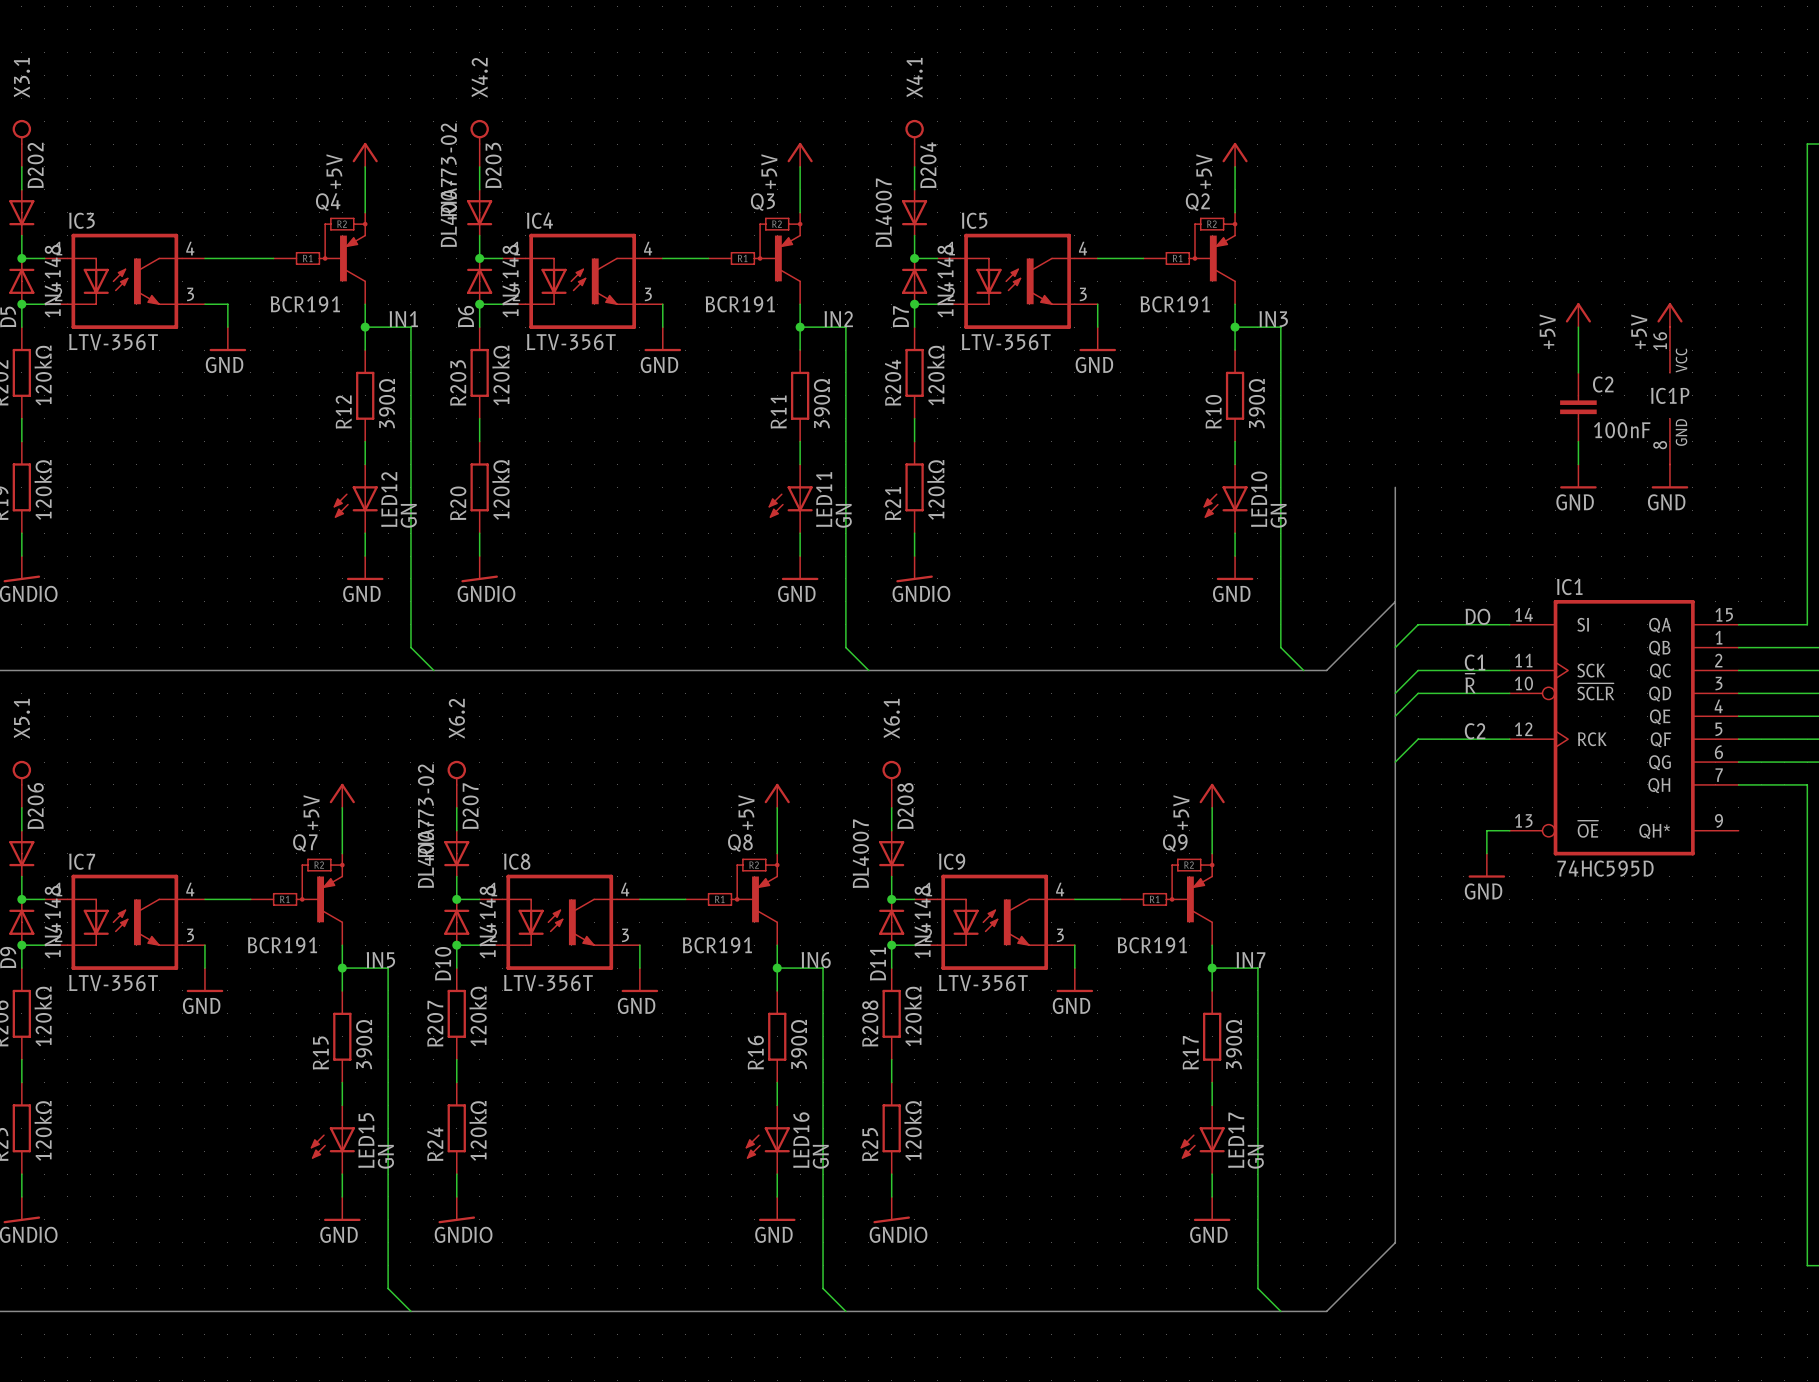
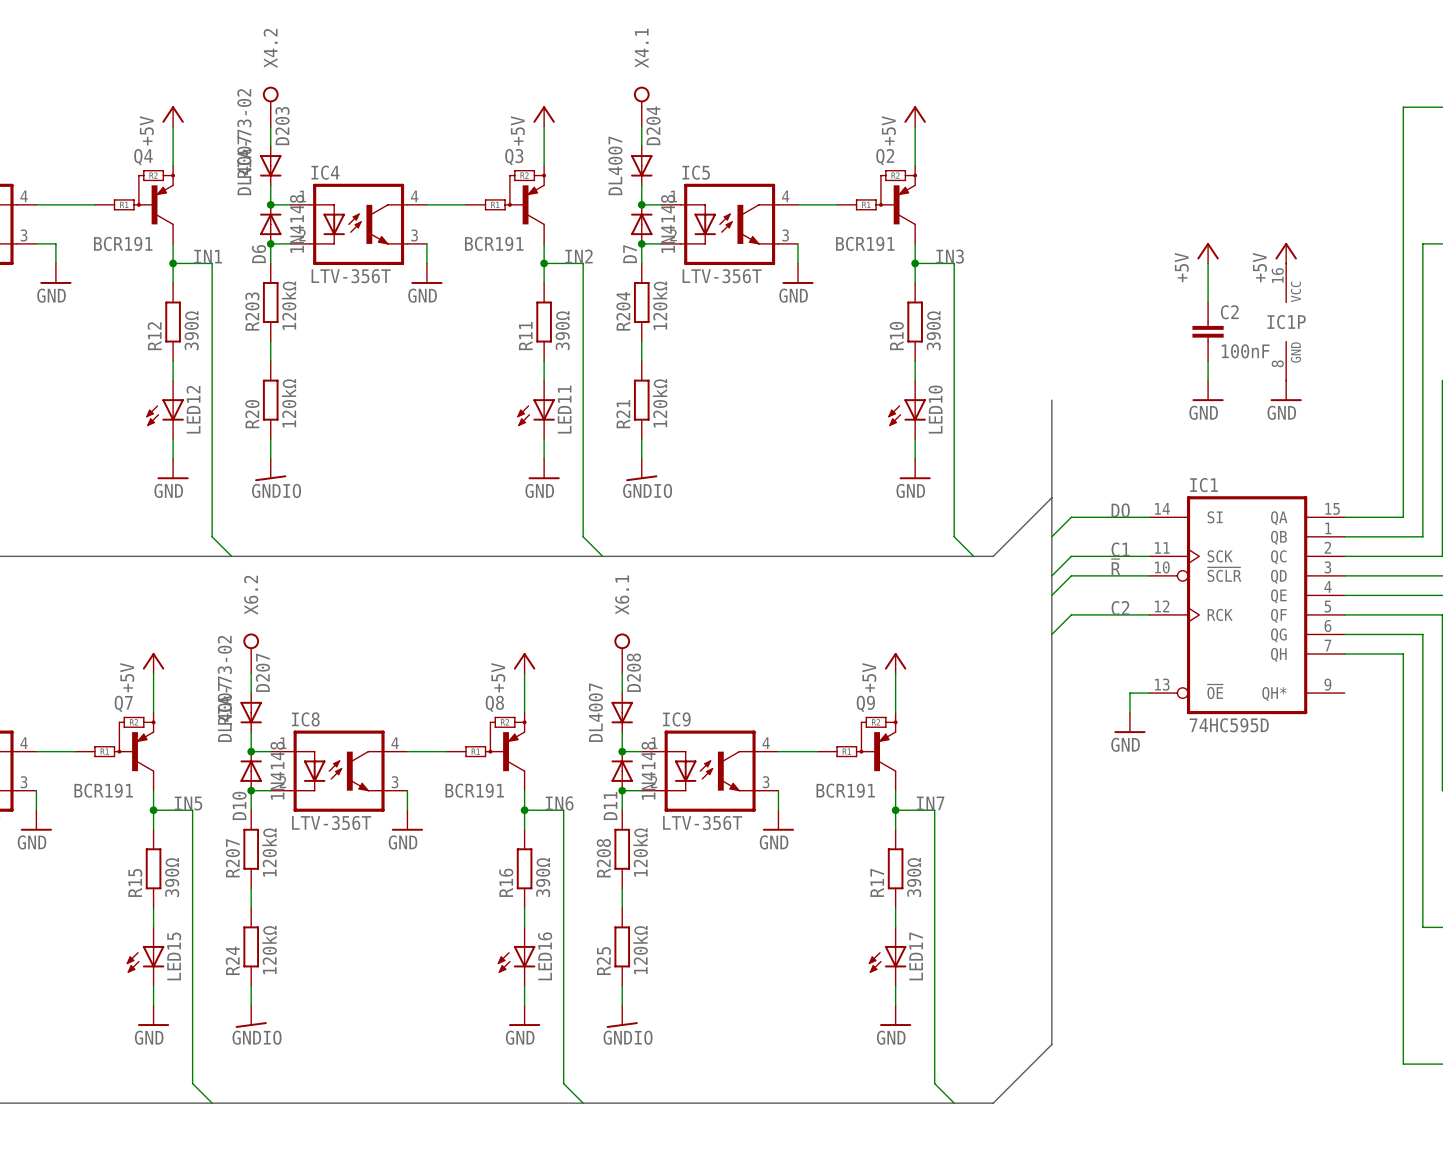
LED12 value: GN (408, 515) -> none
LED11 value: GN (843, 515) -> none
LED10 value: GN (1278, 515) -> none
LED15 value: GN (385, 1156) -> none
LED16 value: GN (820, 1156) -> none
LED17 value: GN (1255, 1156) -> none

